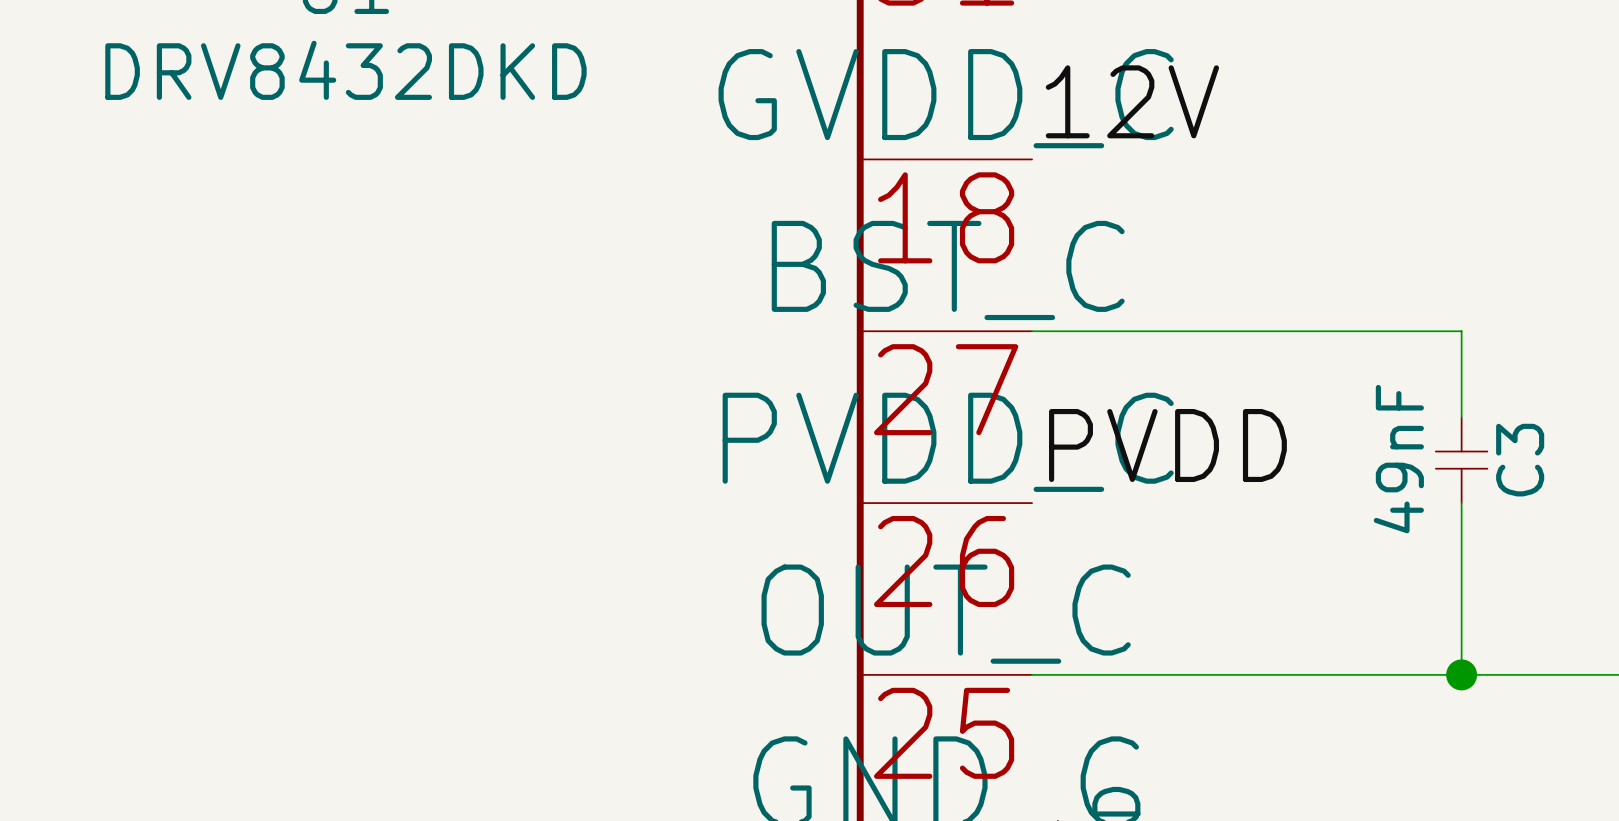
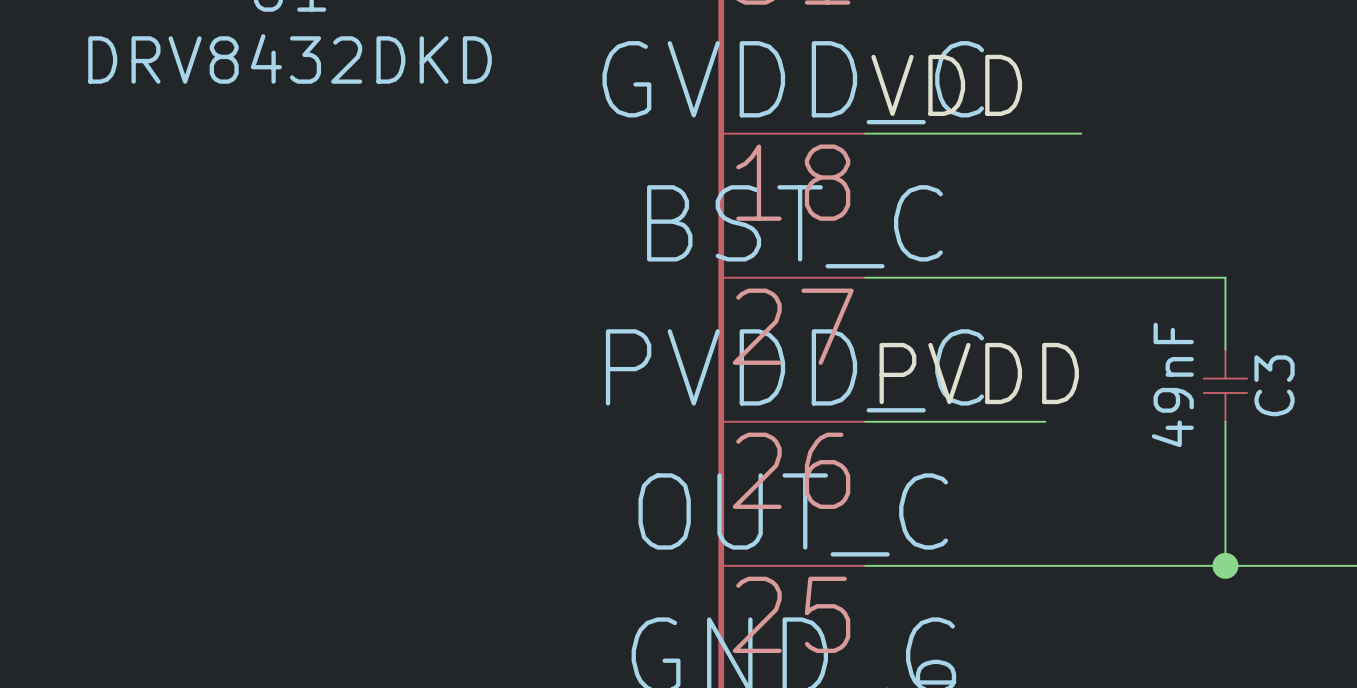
label: 12V (1132, 101) -> VDD (946, 85)
wire: none -> (865, 133) (1081, 133)
wire: none -> (865, 421) (1045, 421)

